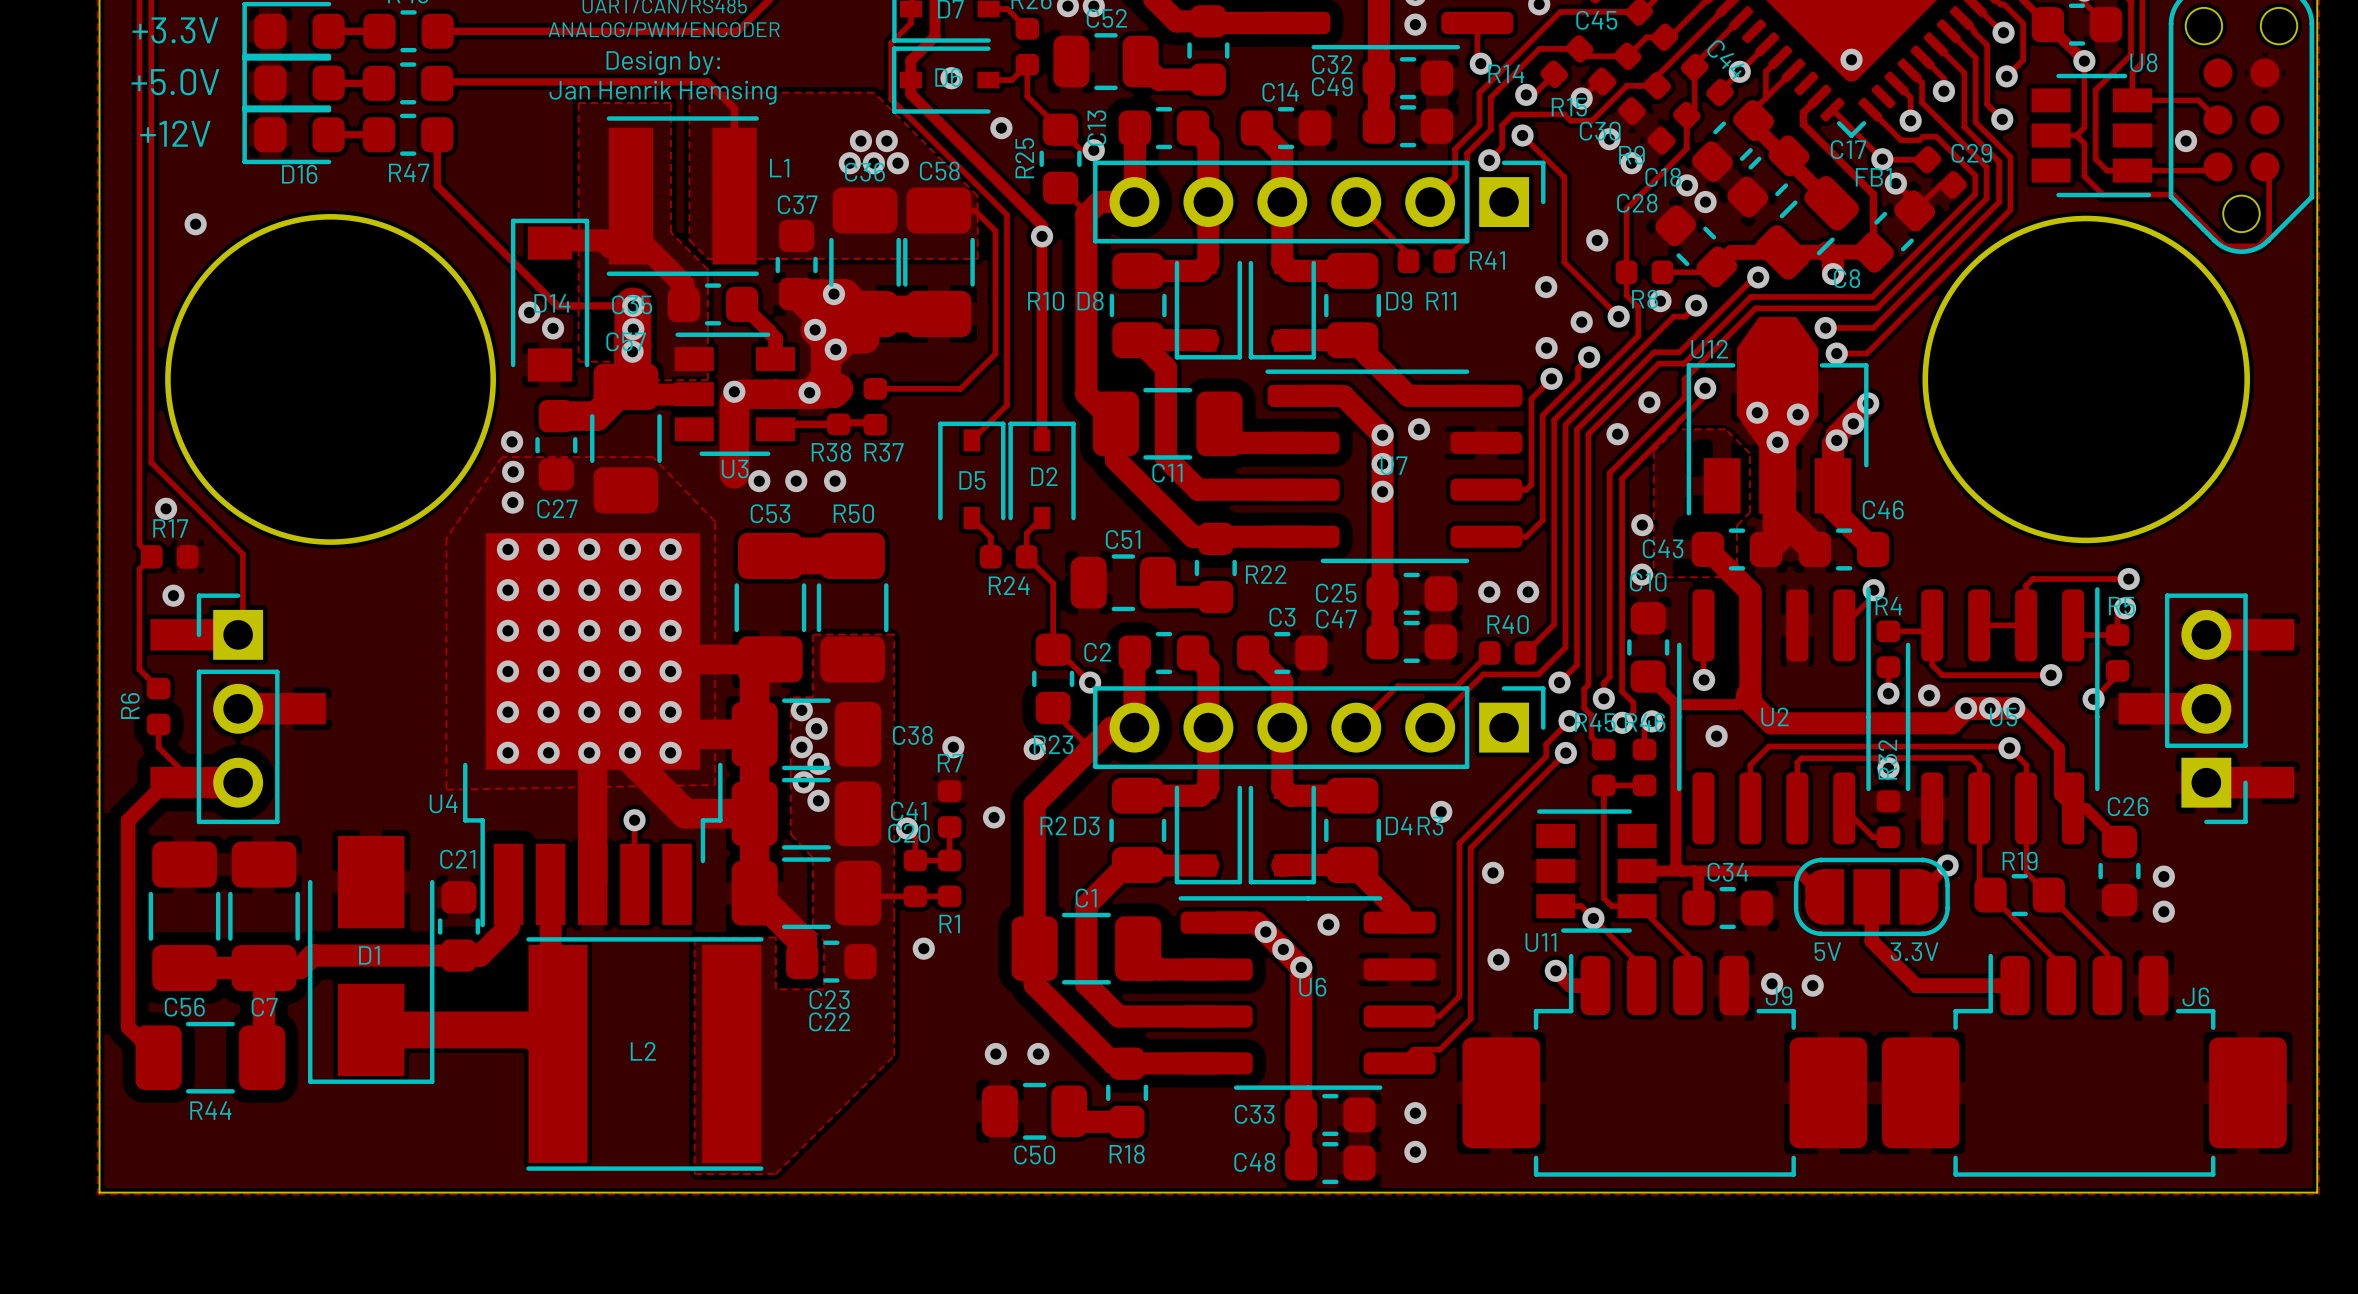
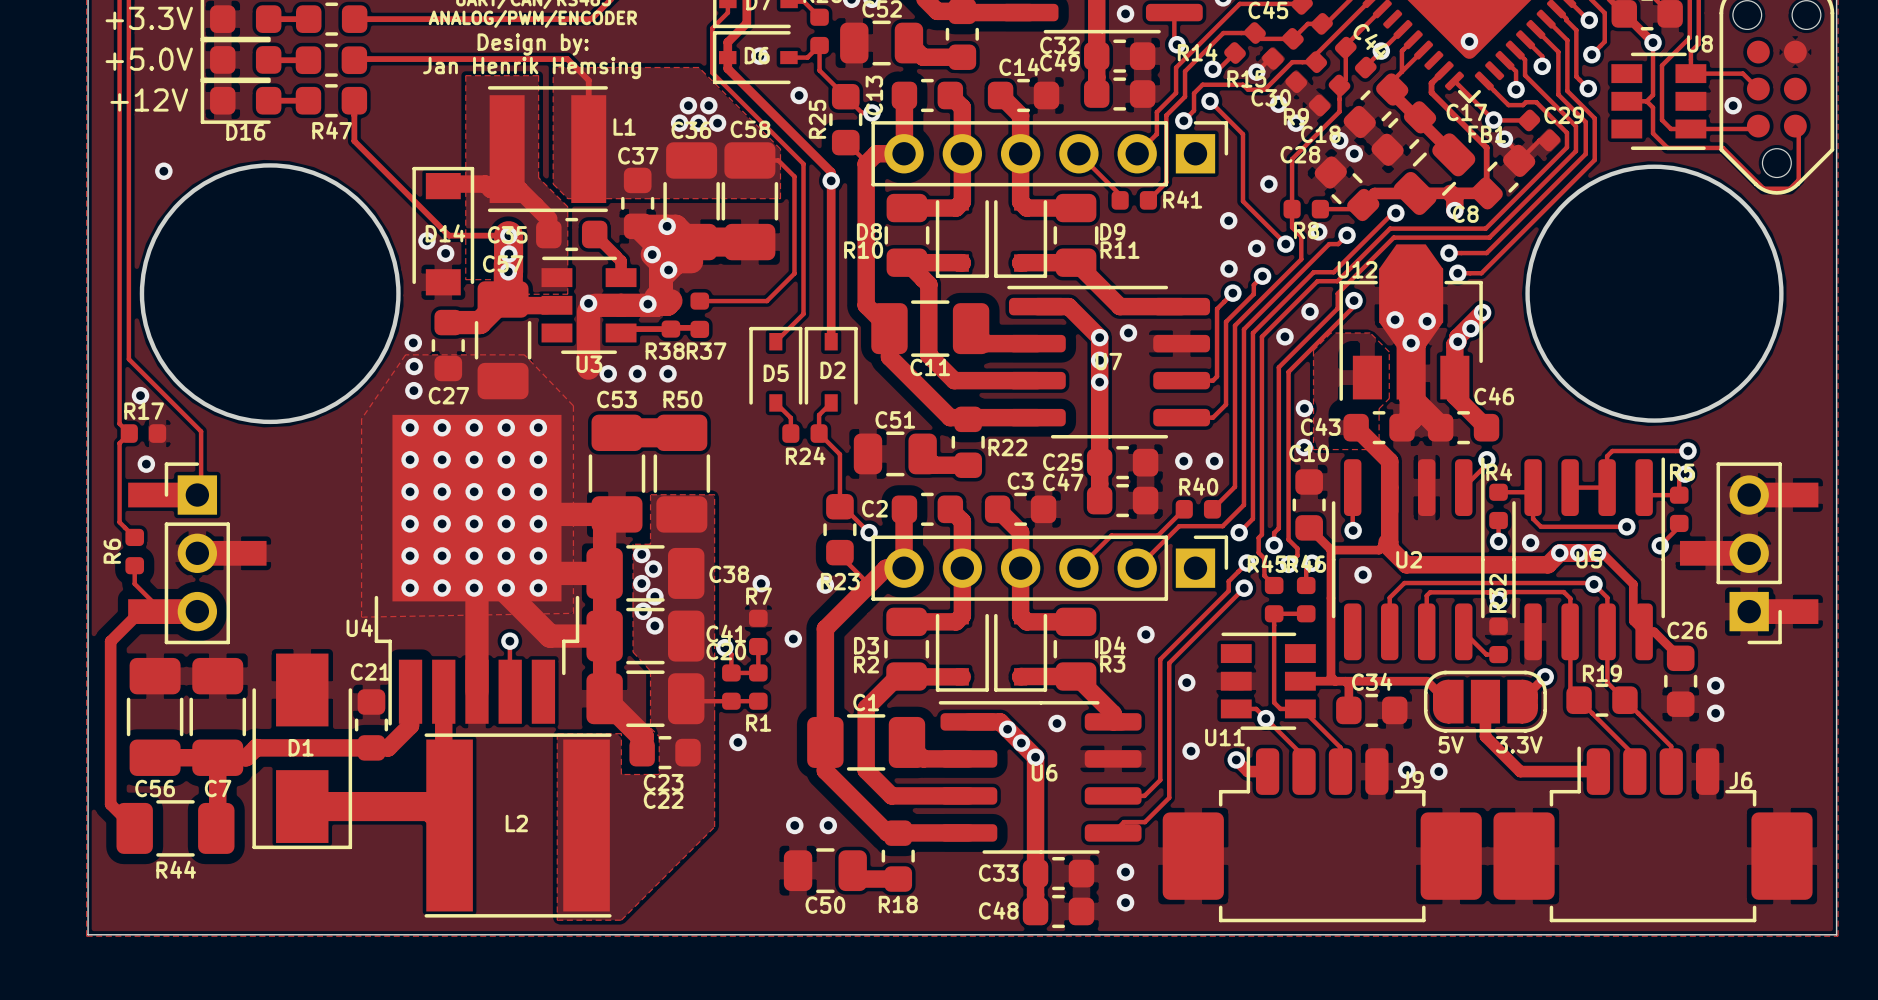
R10 name position: R10 (1046, 301) -> R10 (863, 250)
R11 name position: R11 (1441, 301) -> R11 (1120, 250)
R2 name position: R2 (1053, 825) -> R2 (866, 664)
R3 name position: R3 (1430, 826) -> R3 (1112, 663)

